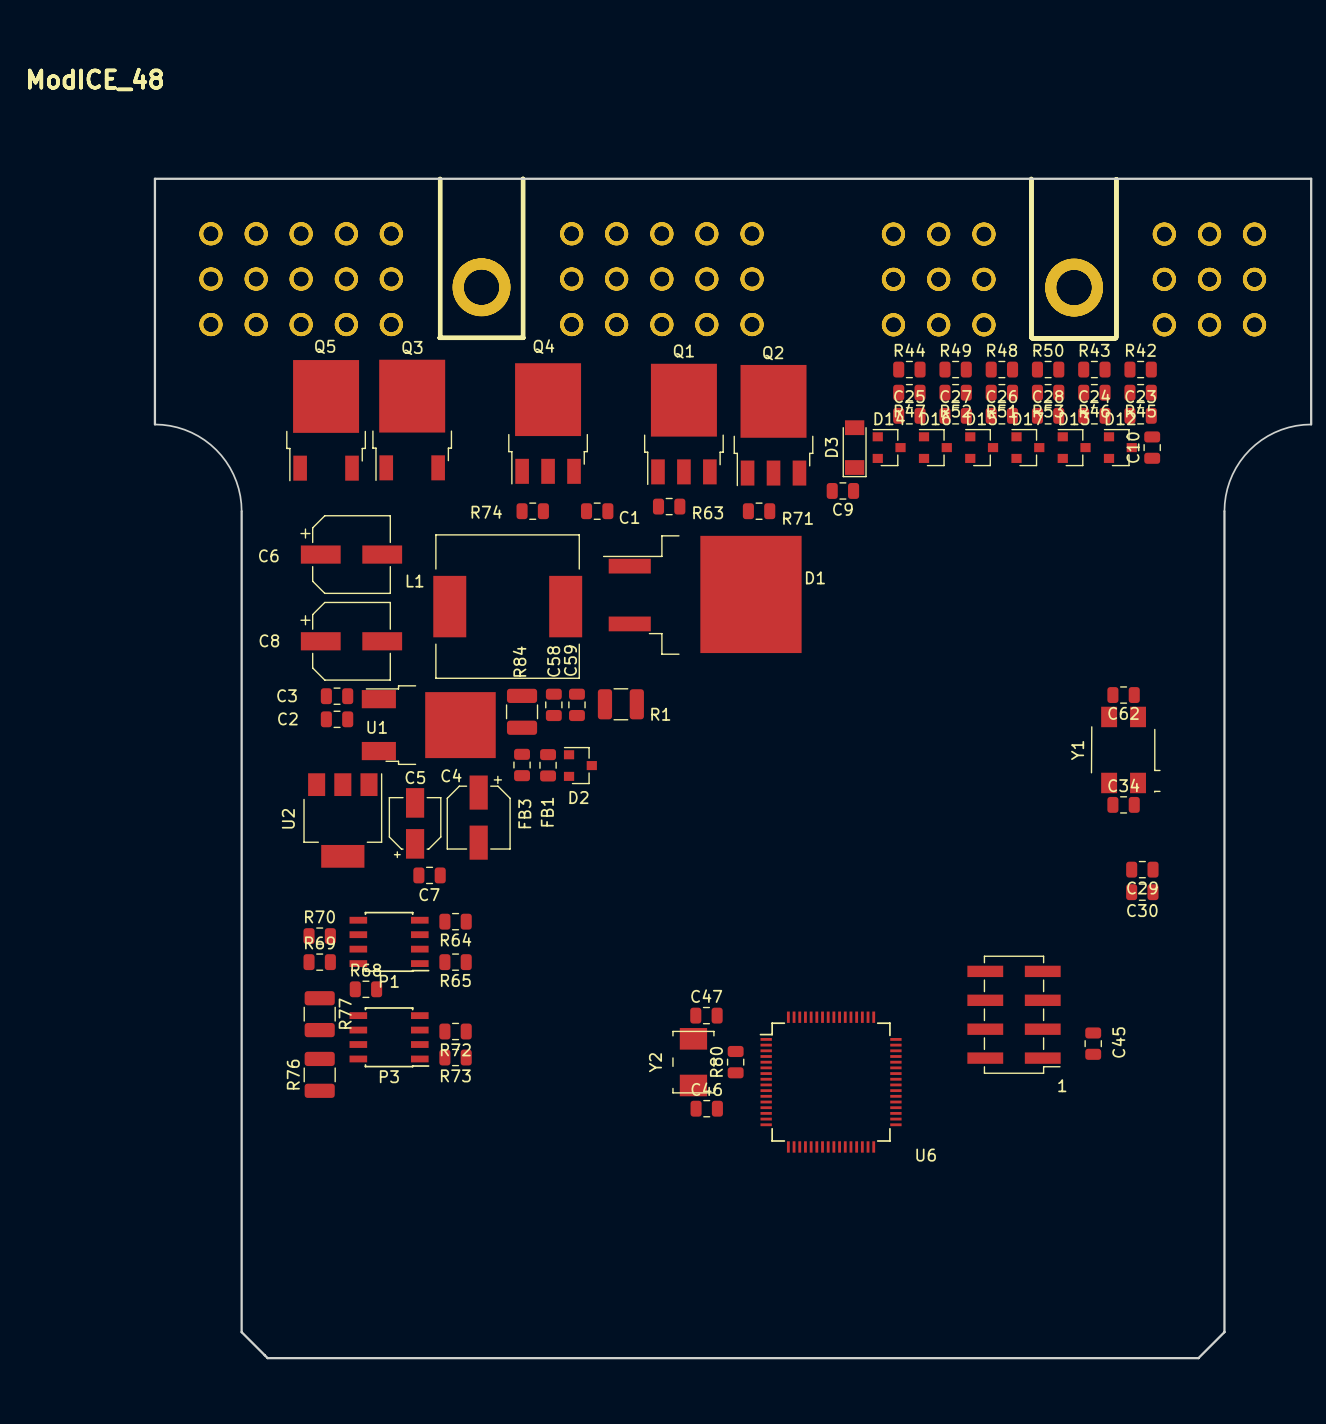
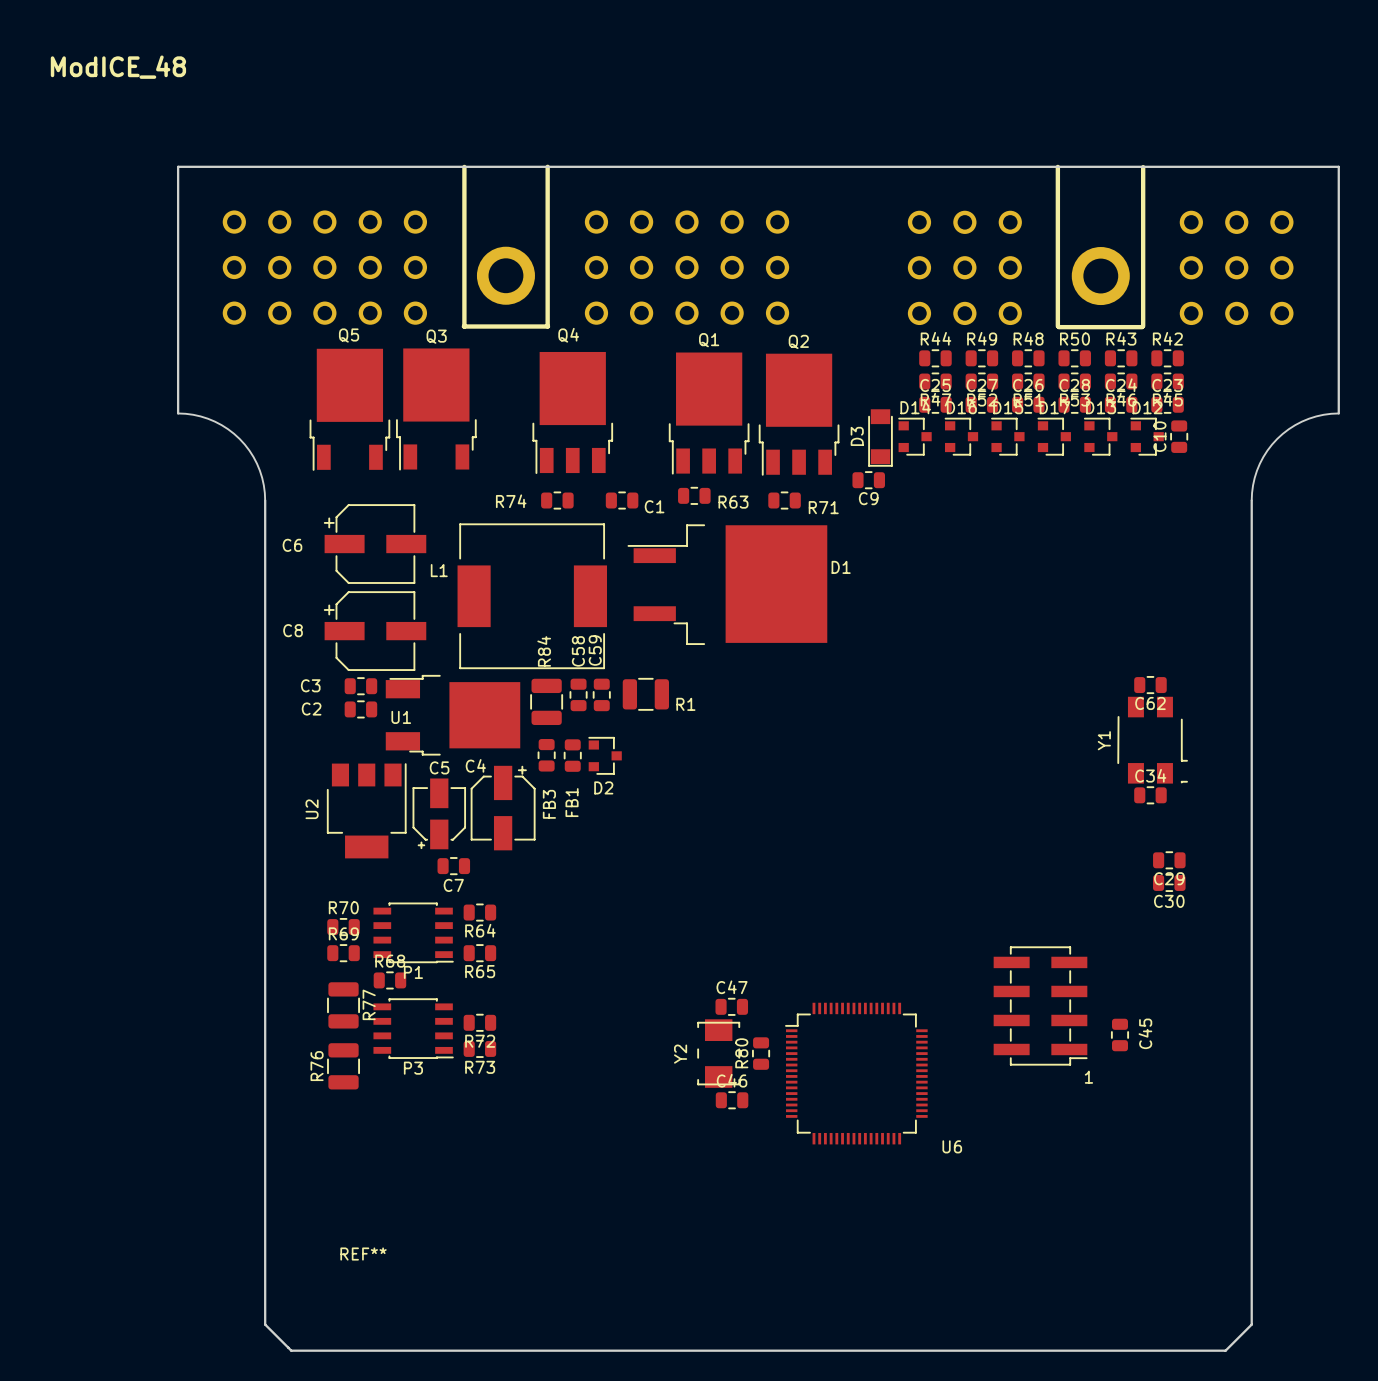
part: ModICE_48 (732, 258) -> none
REF**: none -> (363, 1254)

